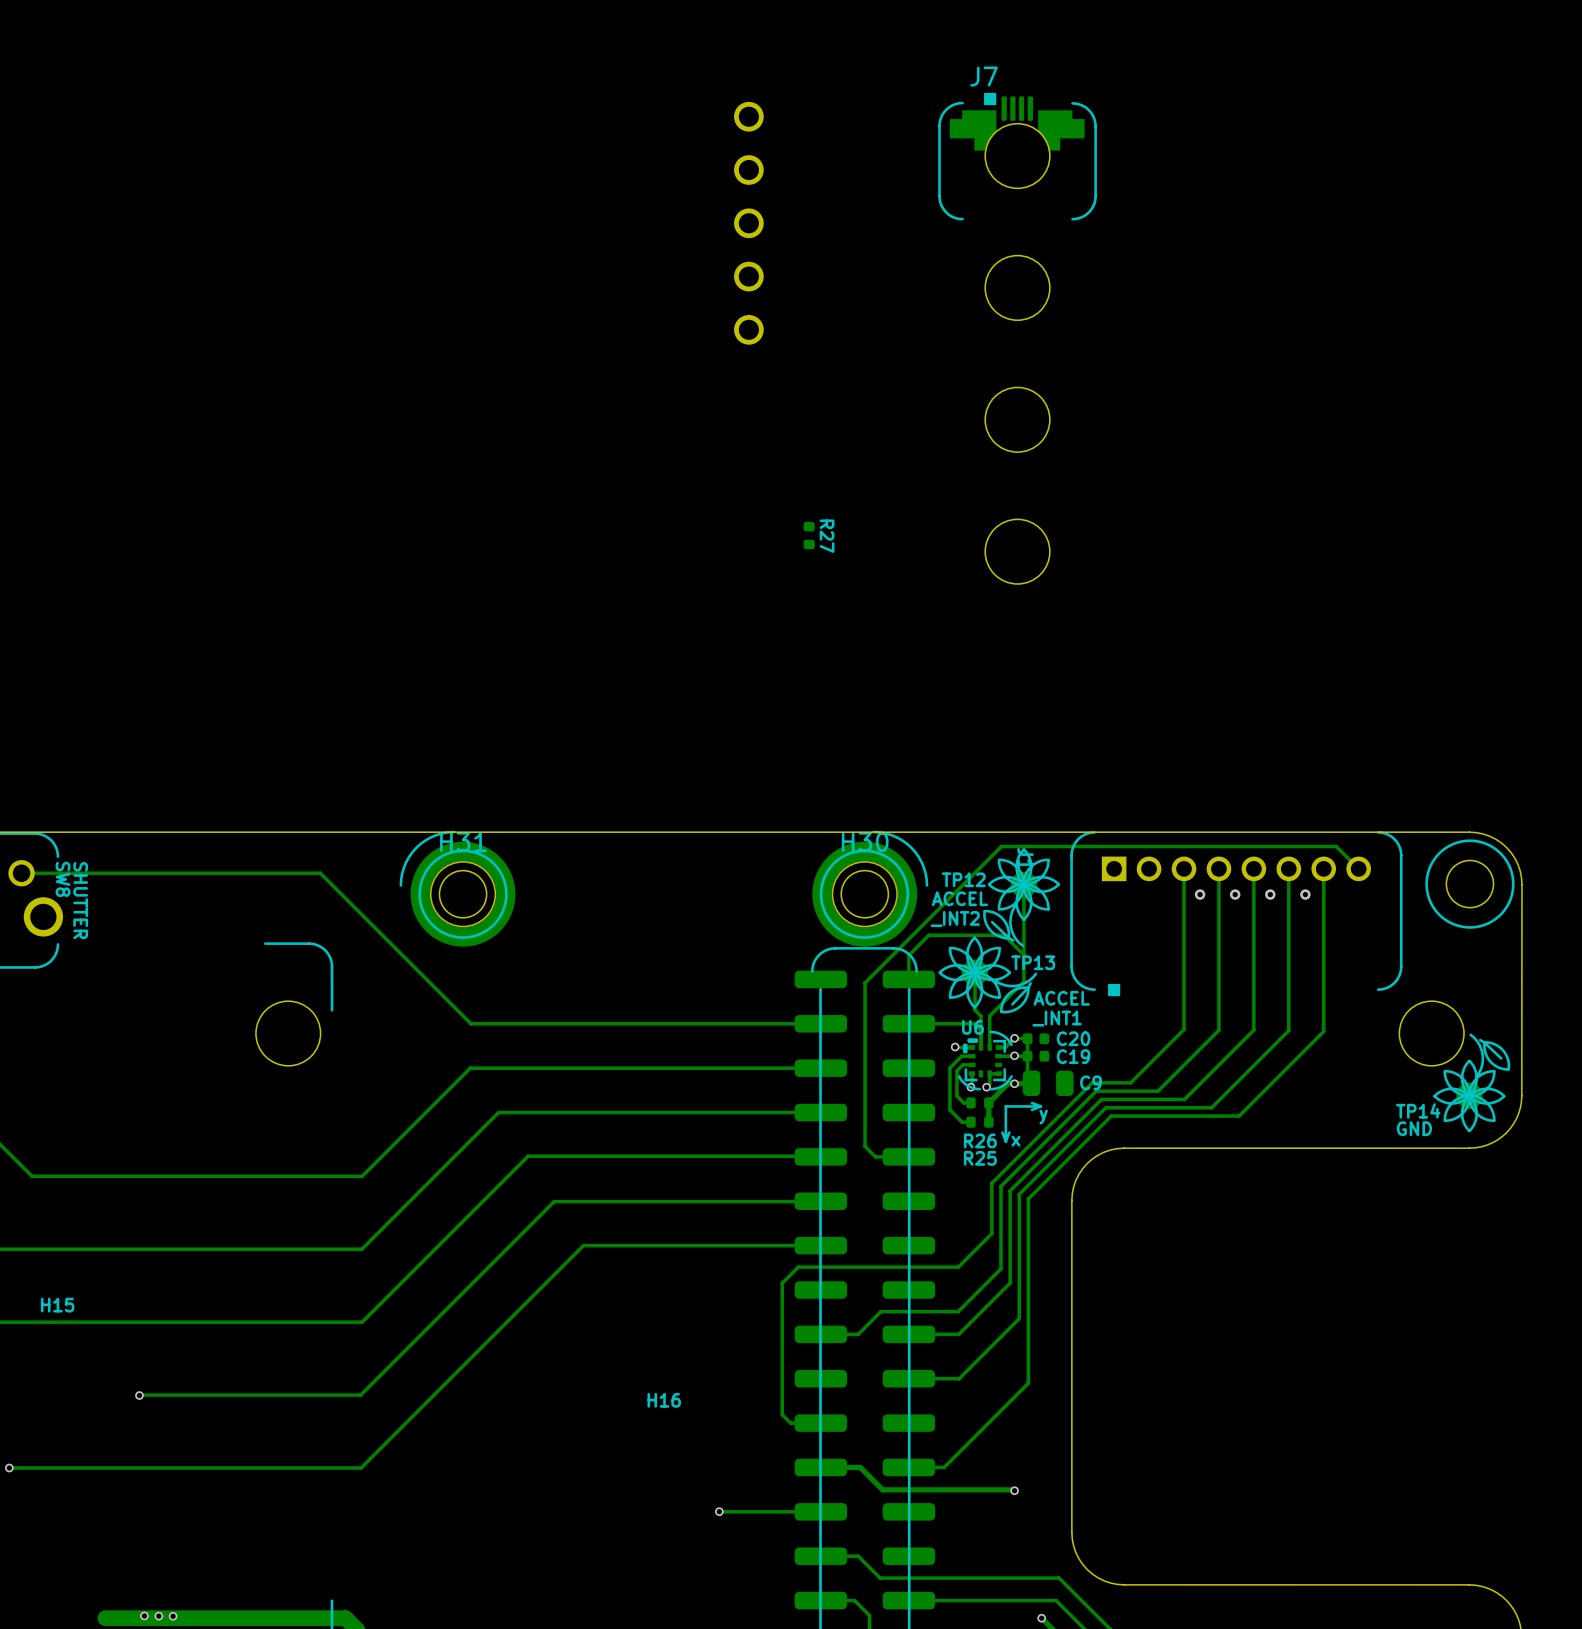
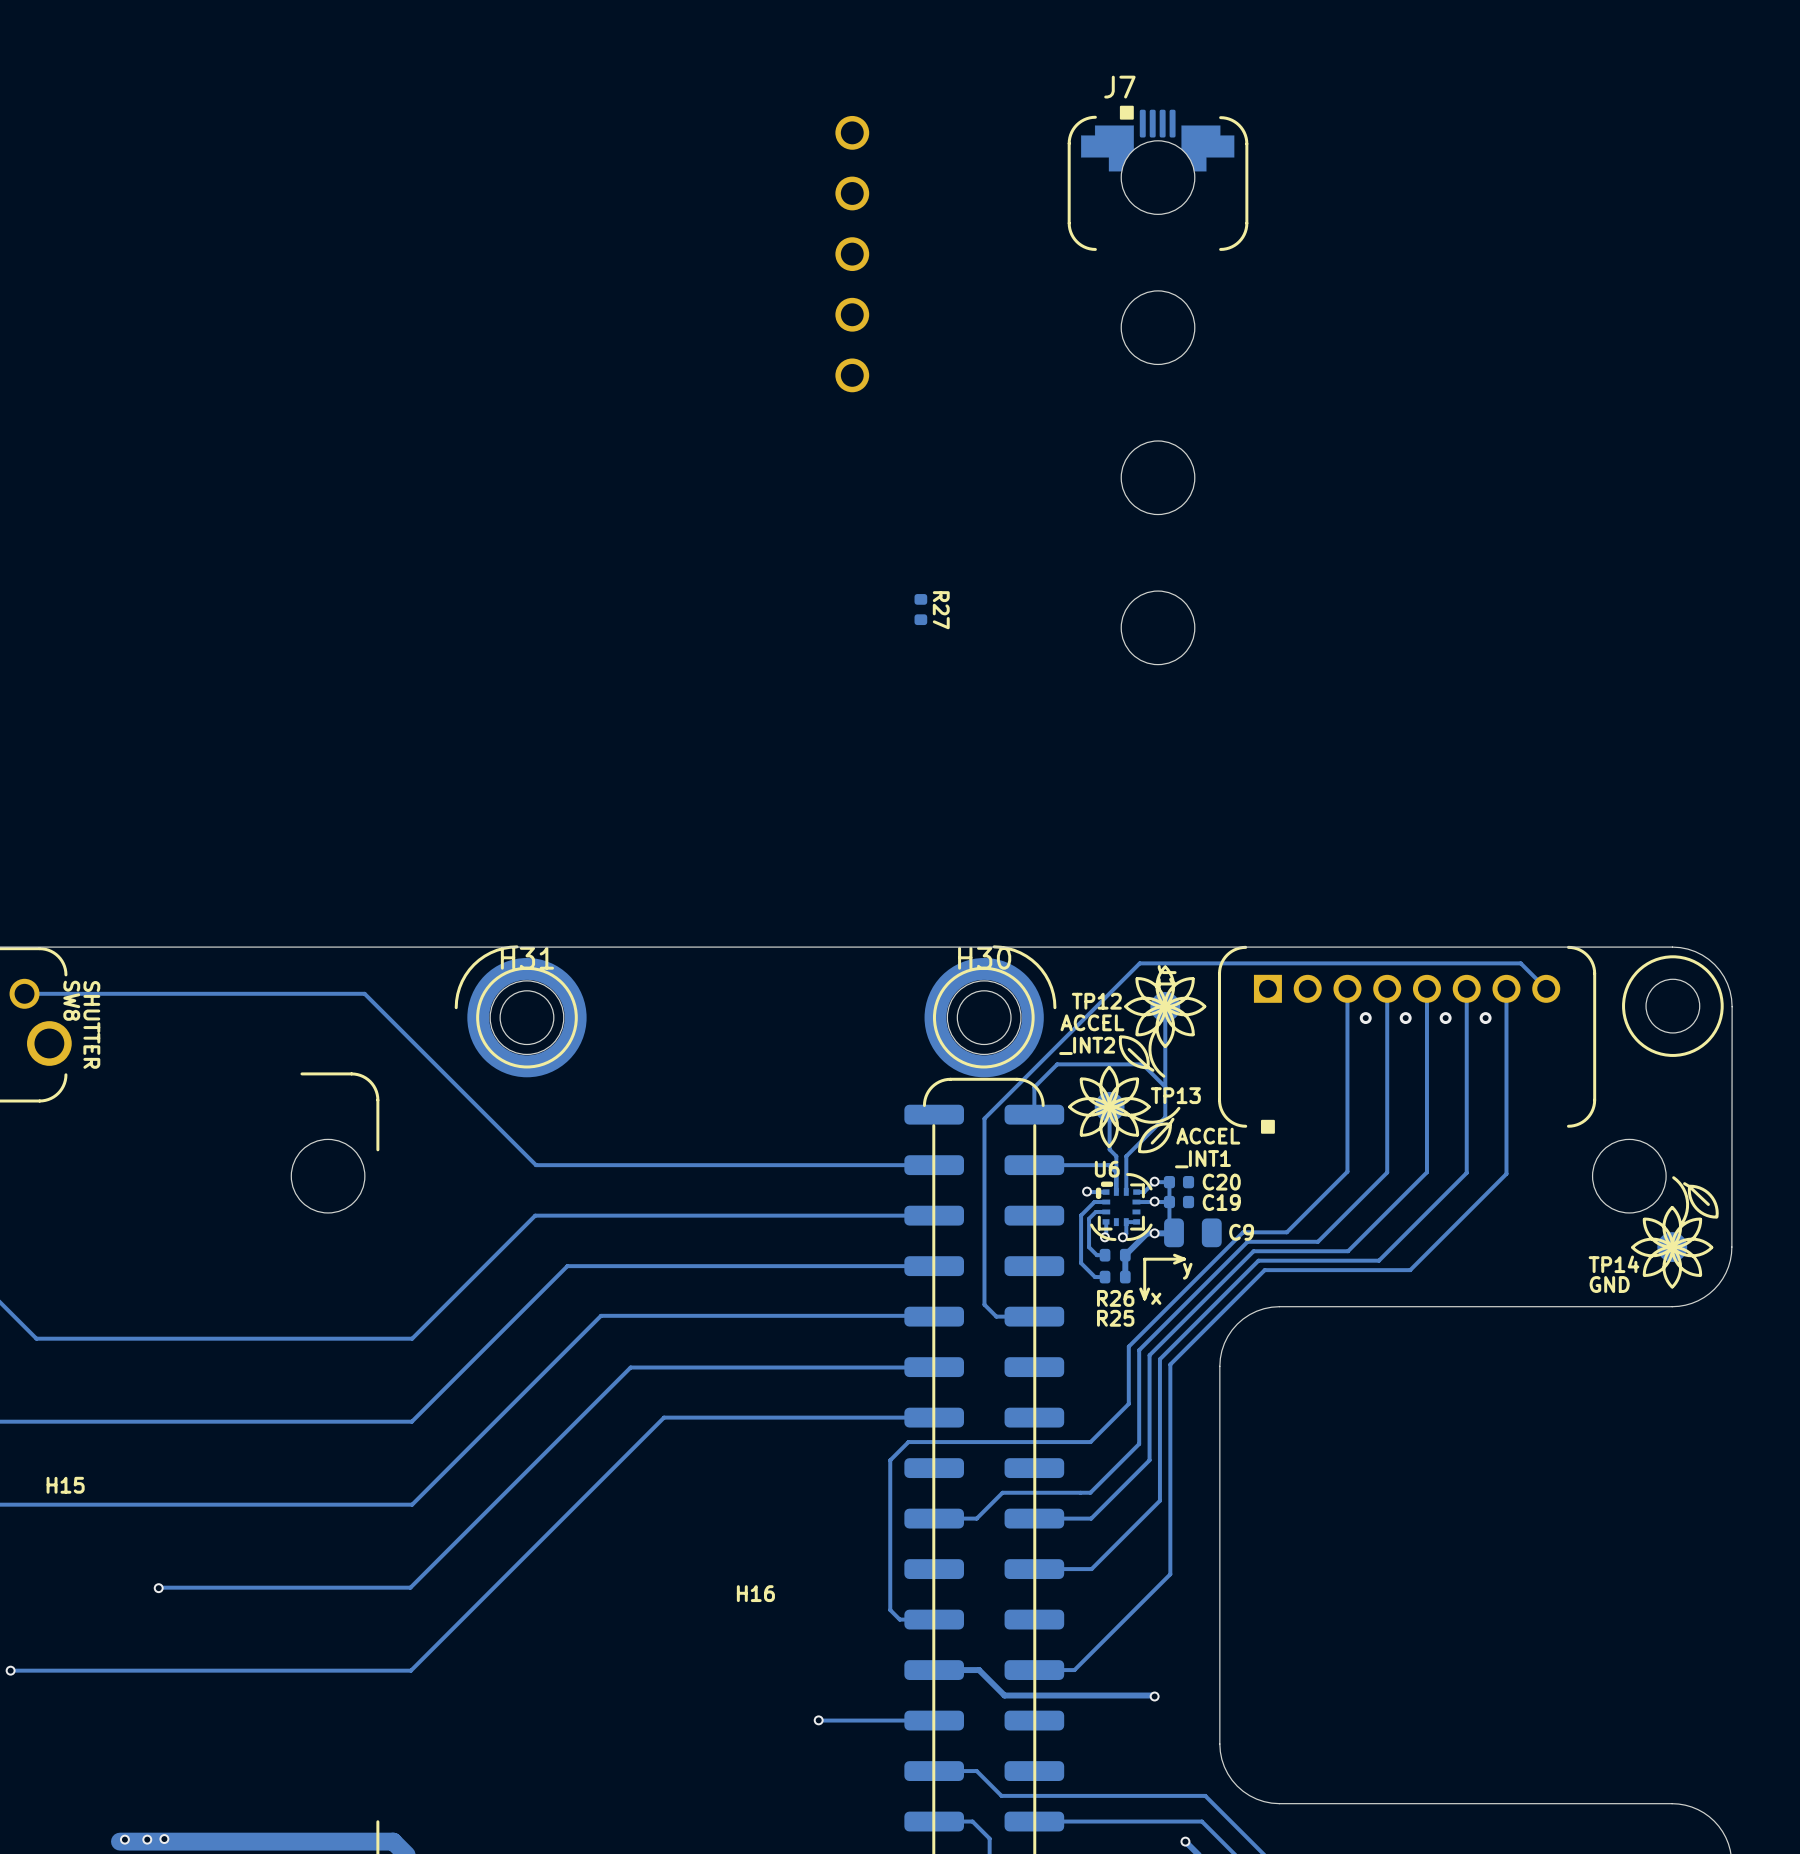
via: none -> (124, 1839)
via: none -> (147, 1839)
via: (158, 1616) -> none
via: (173, 1616) -> none

